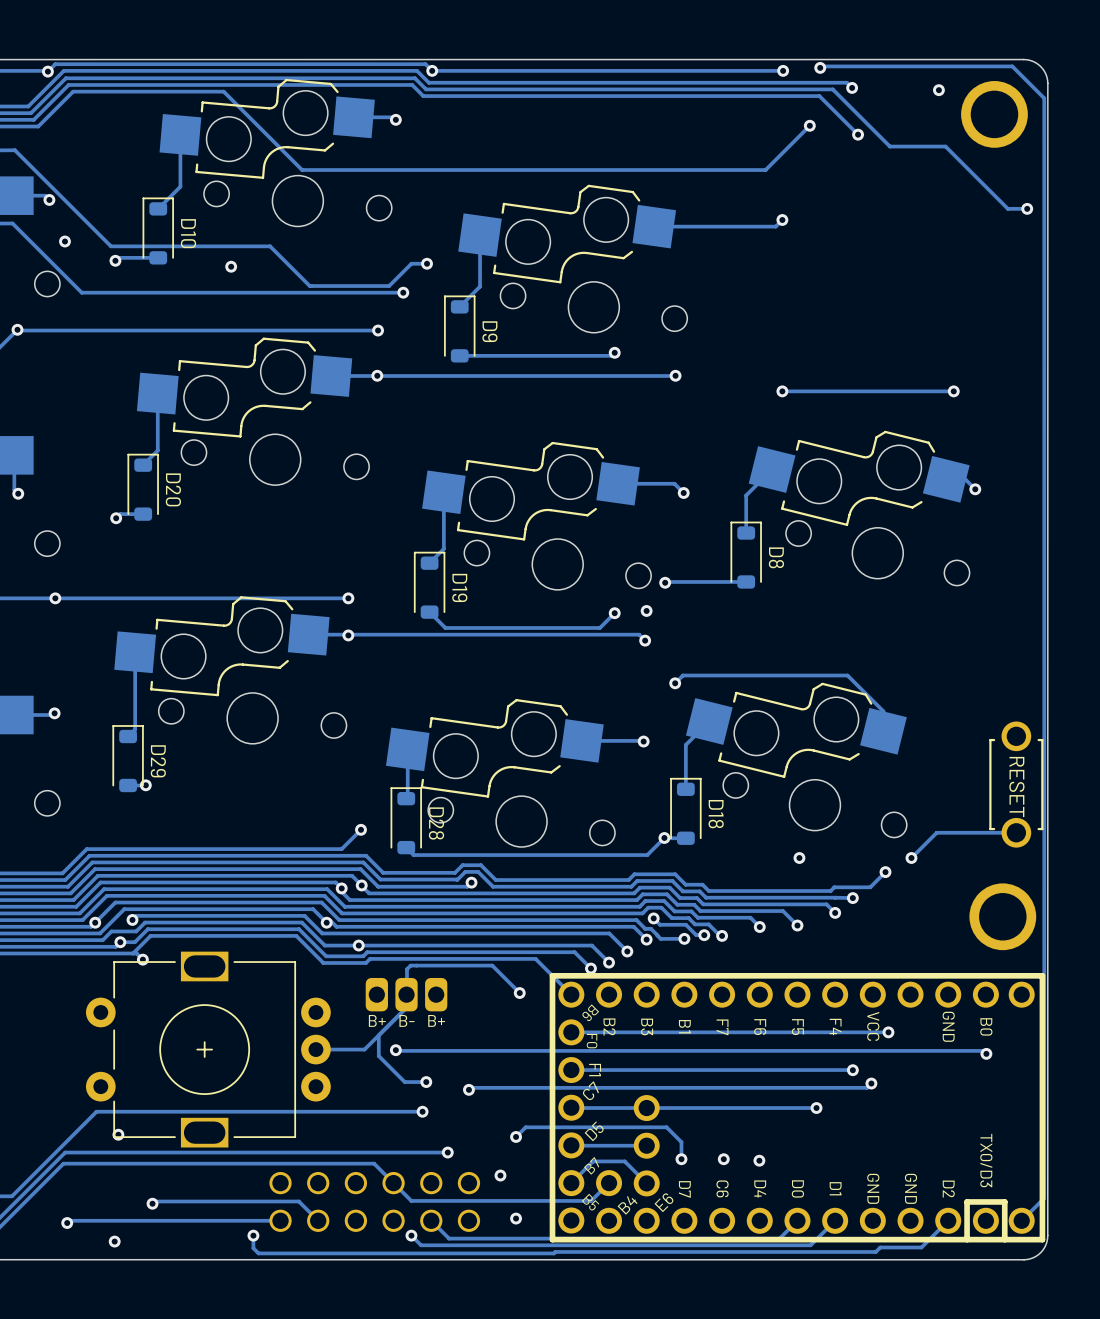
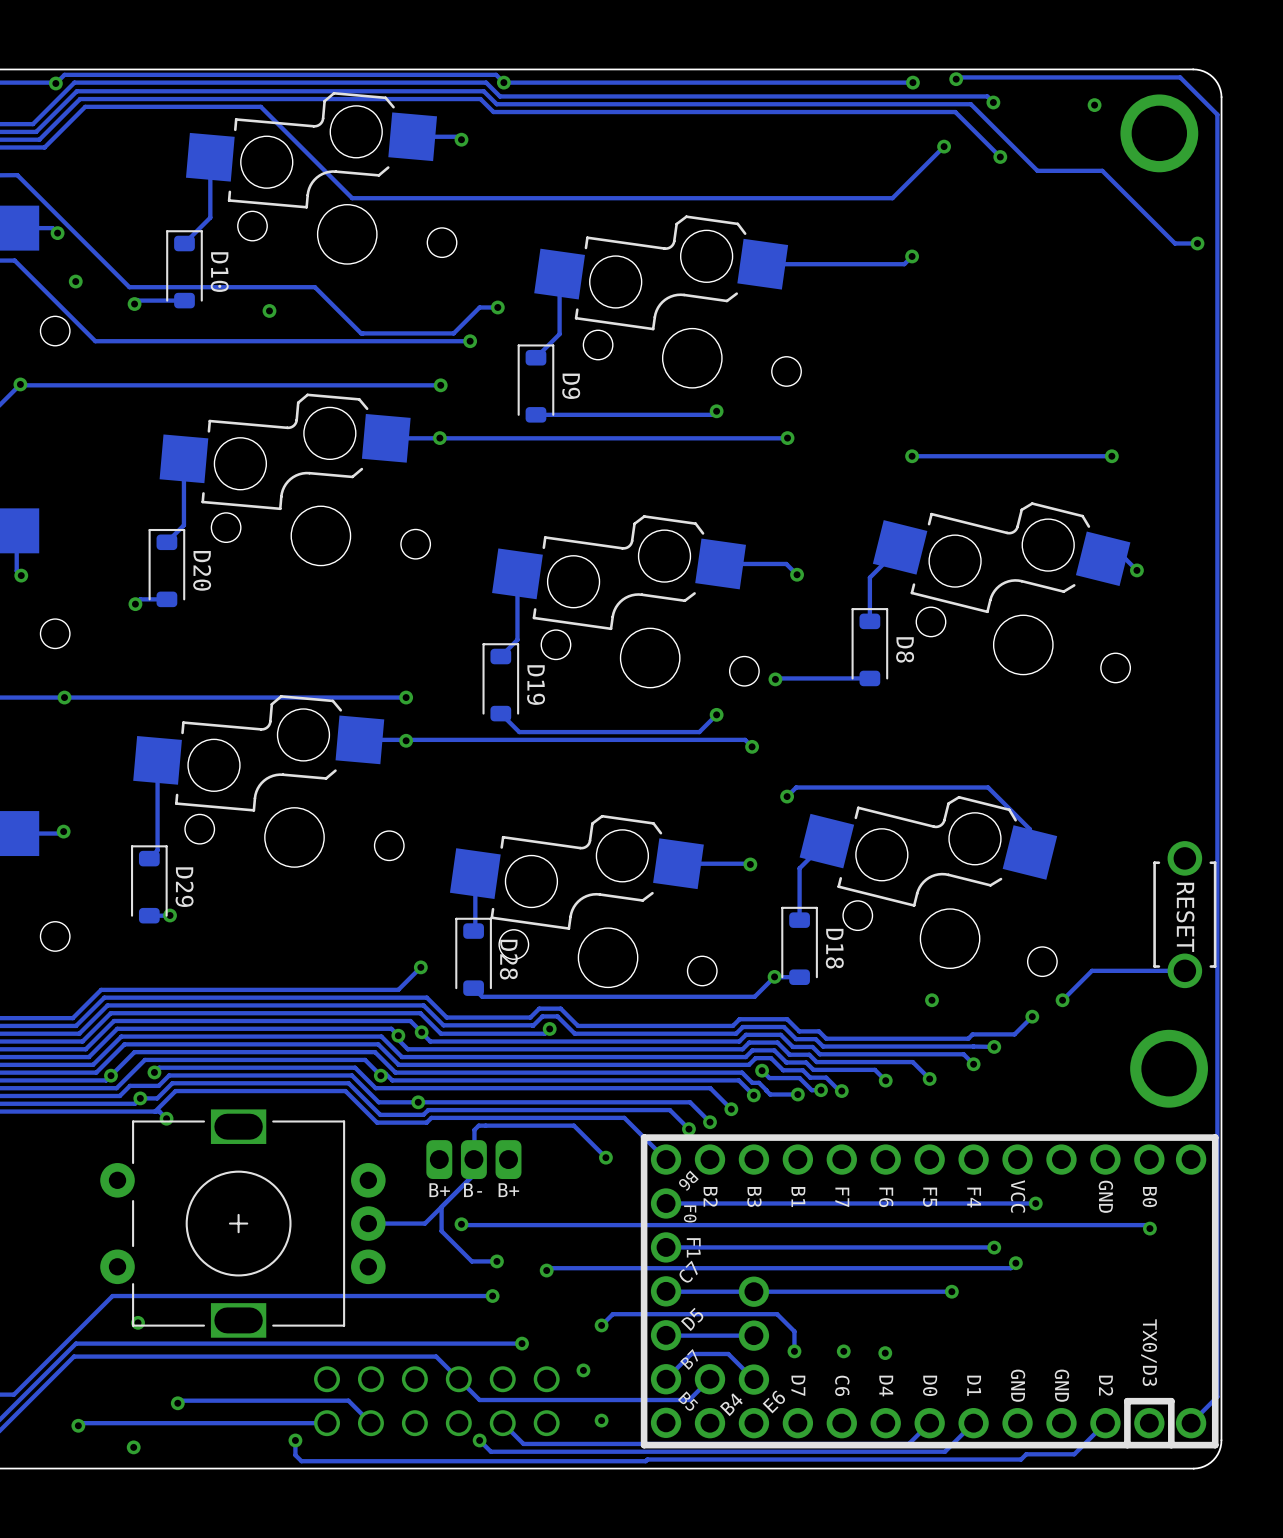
via: (646, 610) -> none

